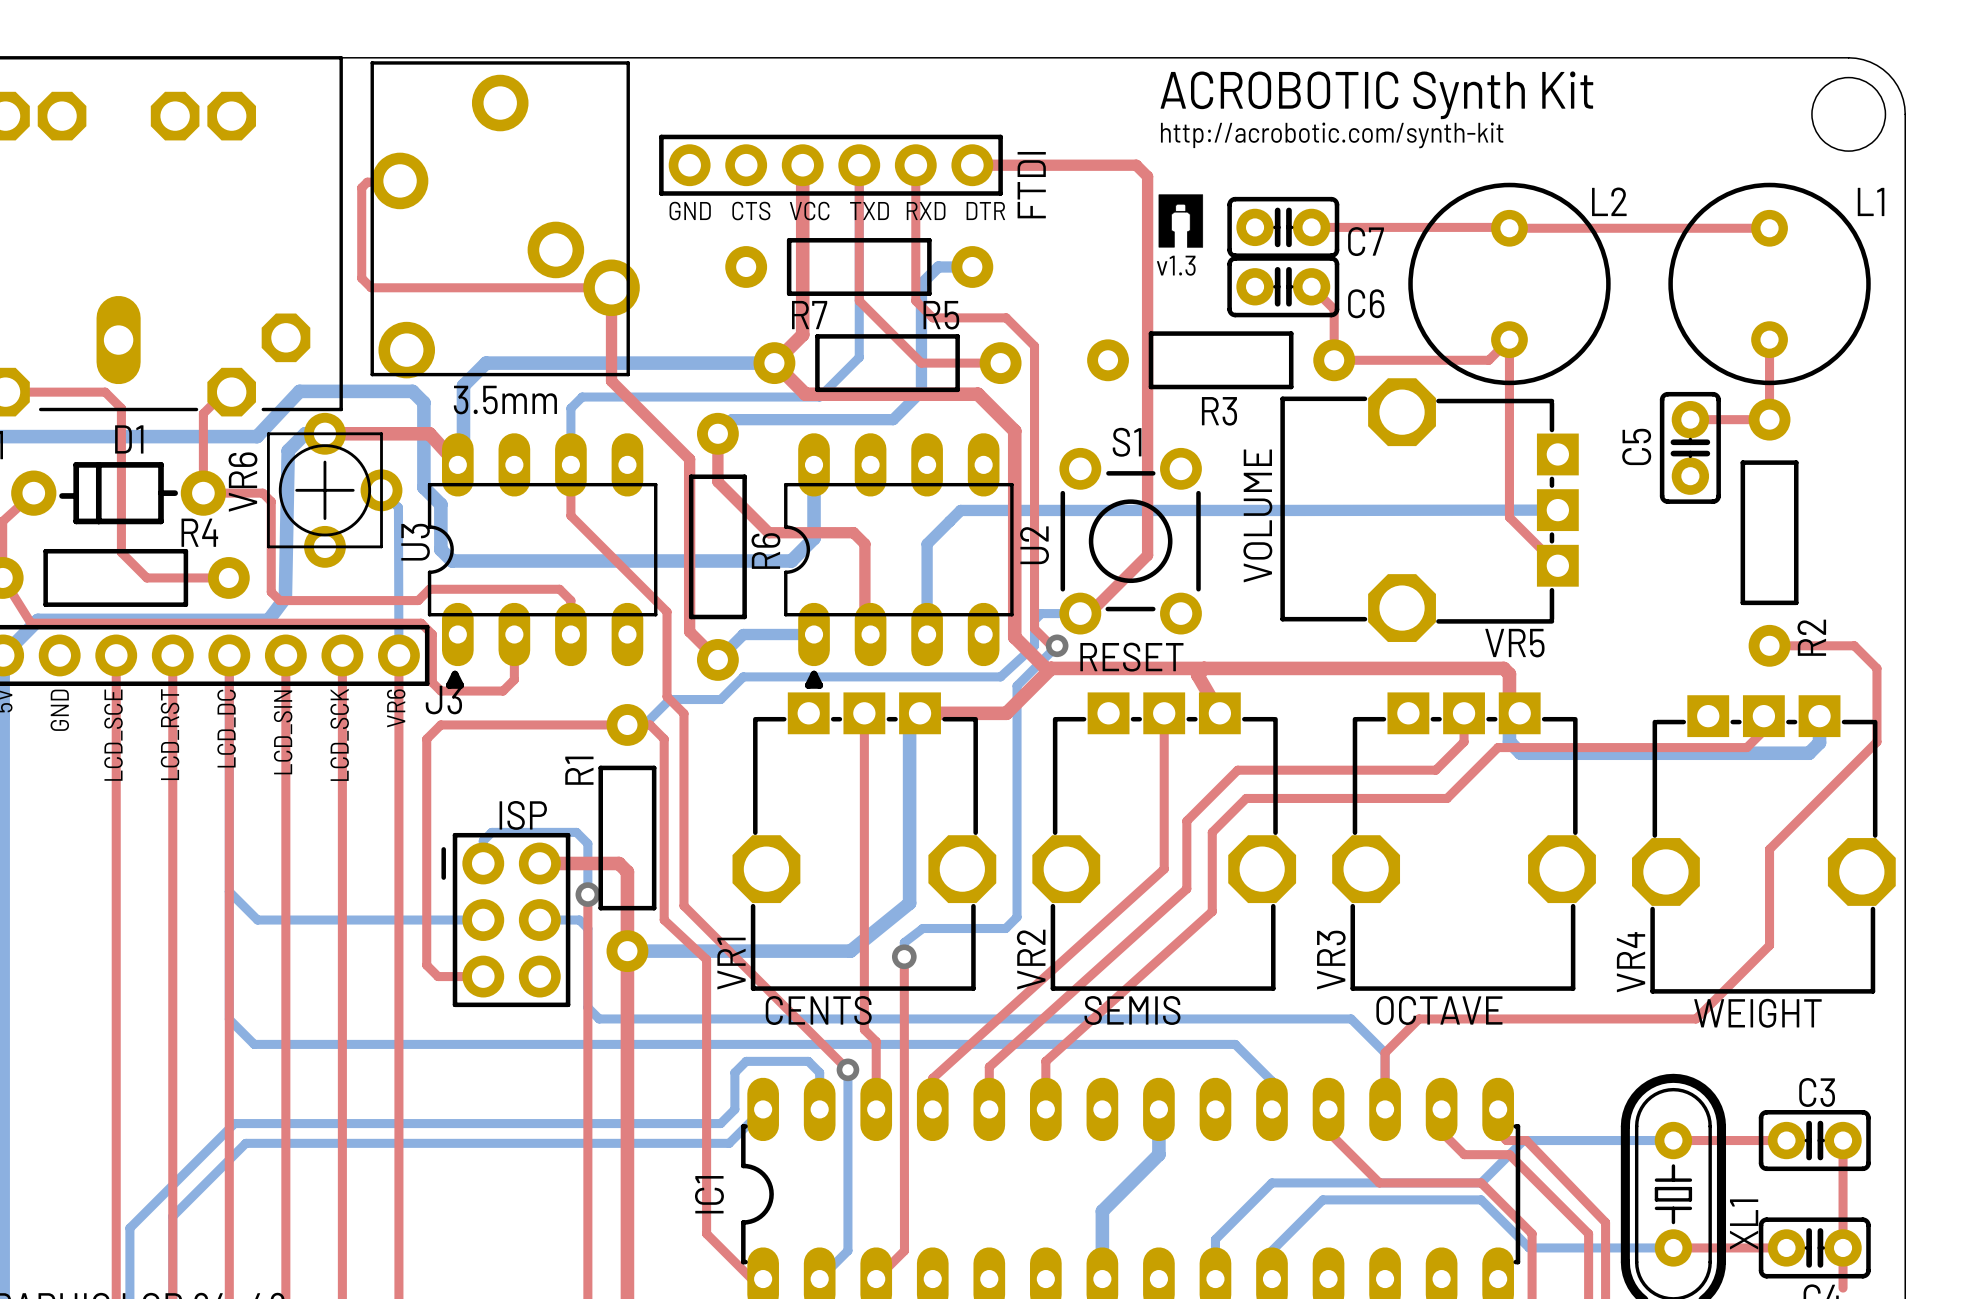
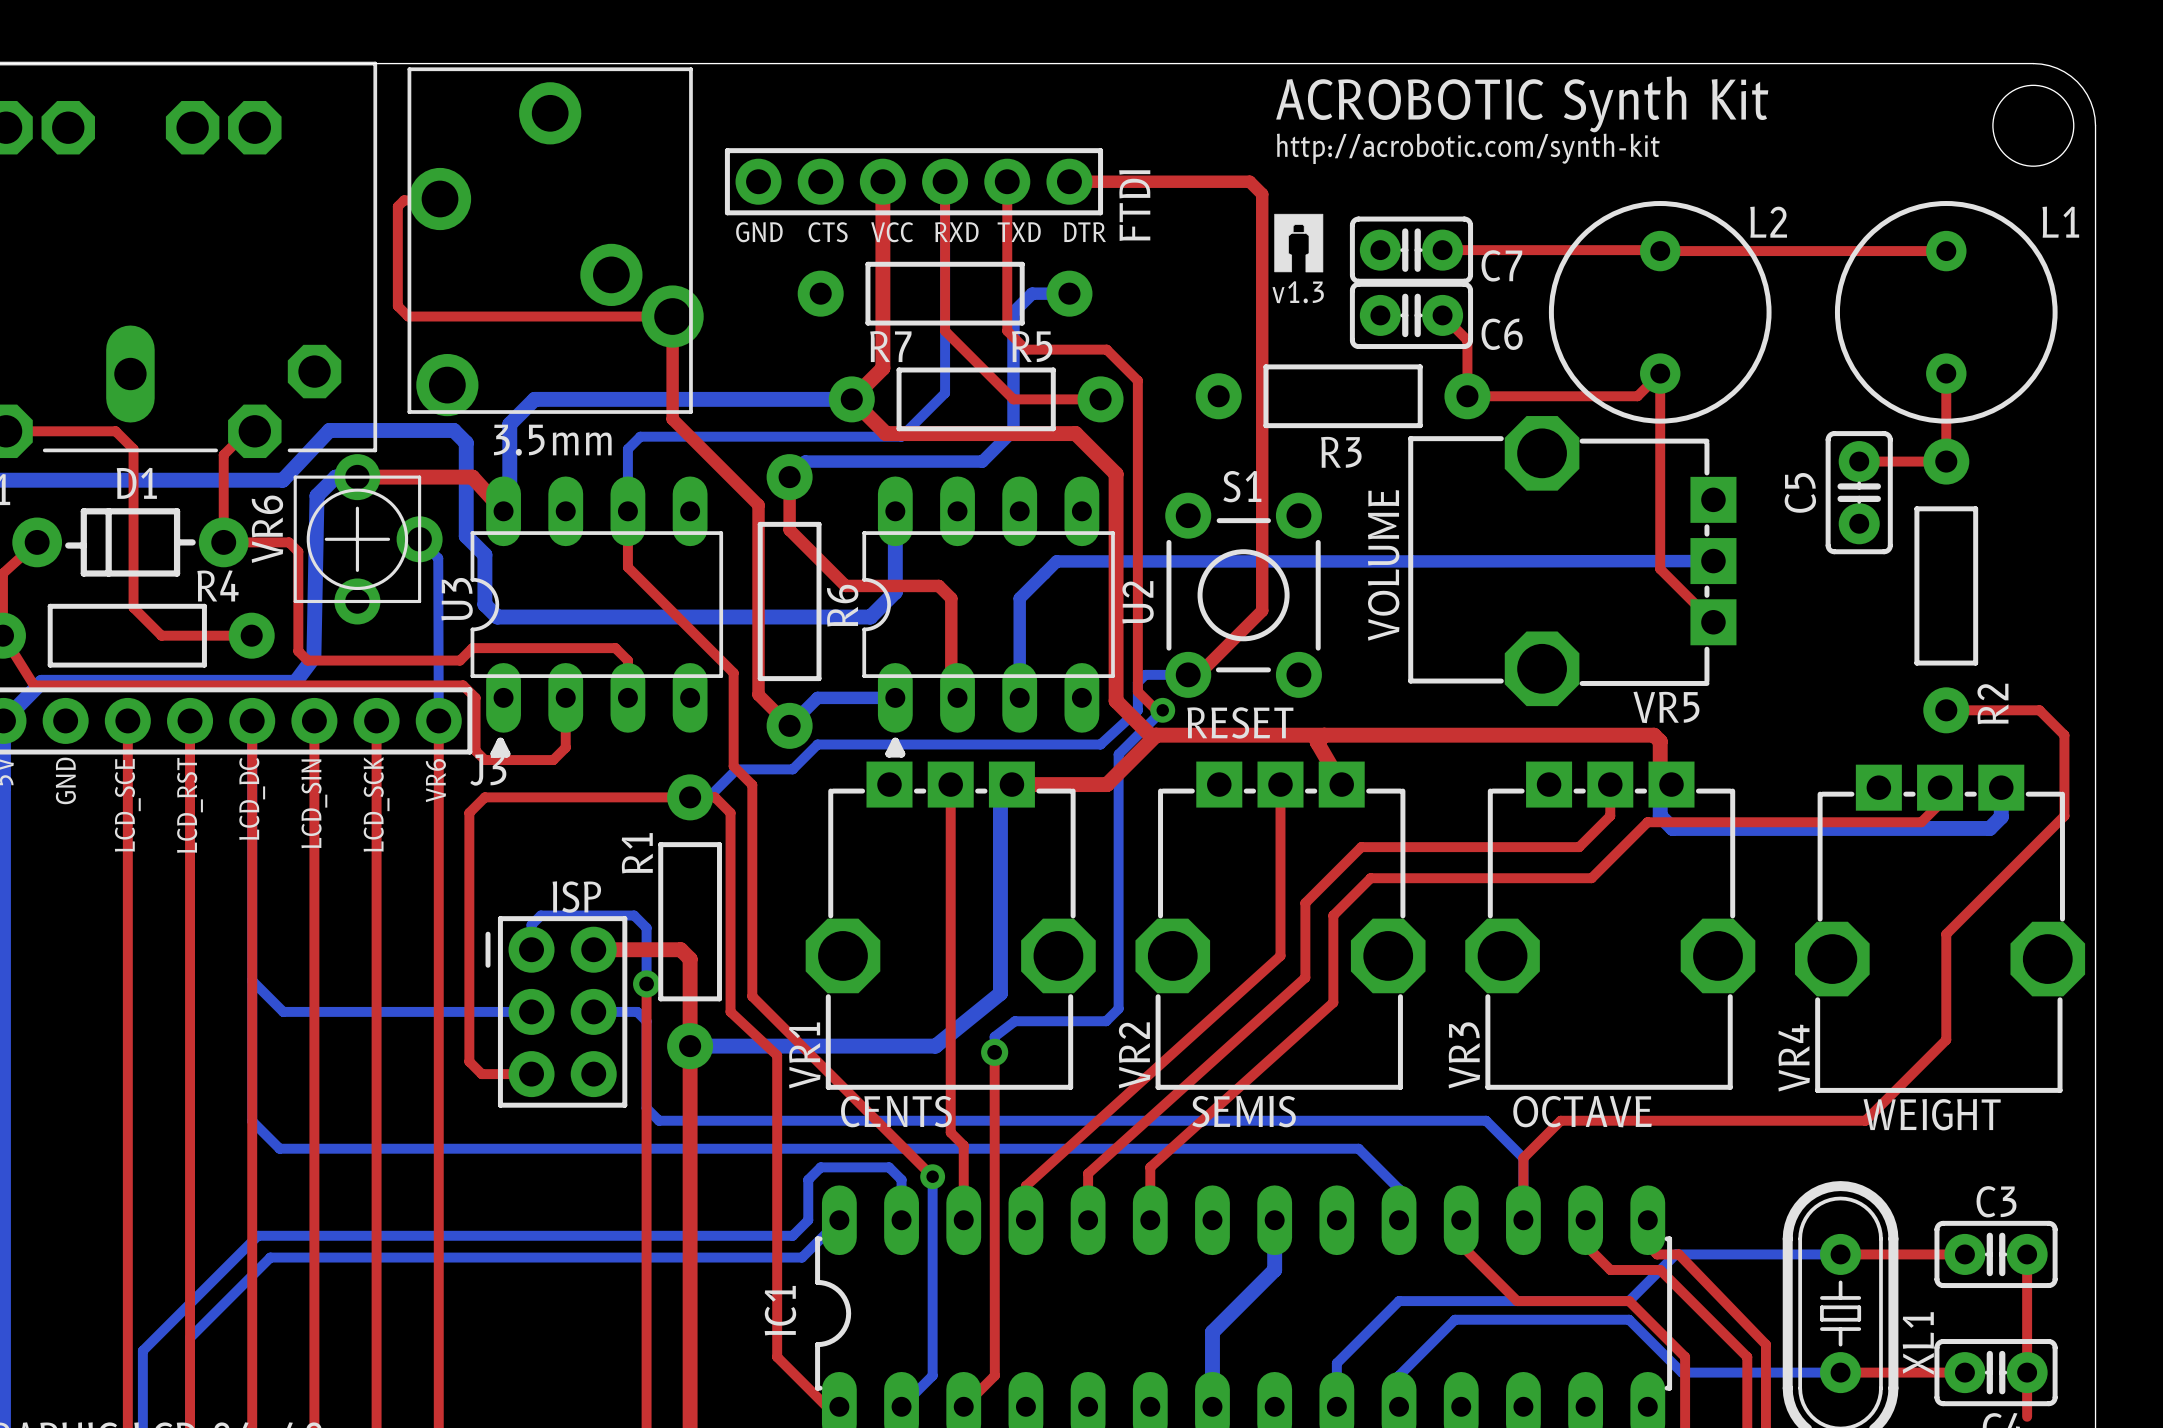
text: TXD (869, 211) -> RXD (956, 232)
text: RXD (926, 211) -> TXD (1019, 232)

